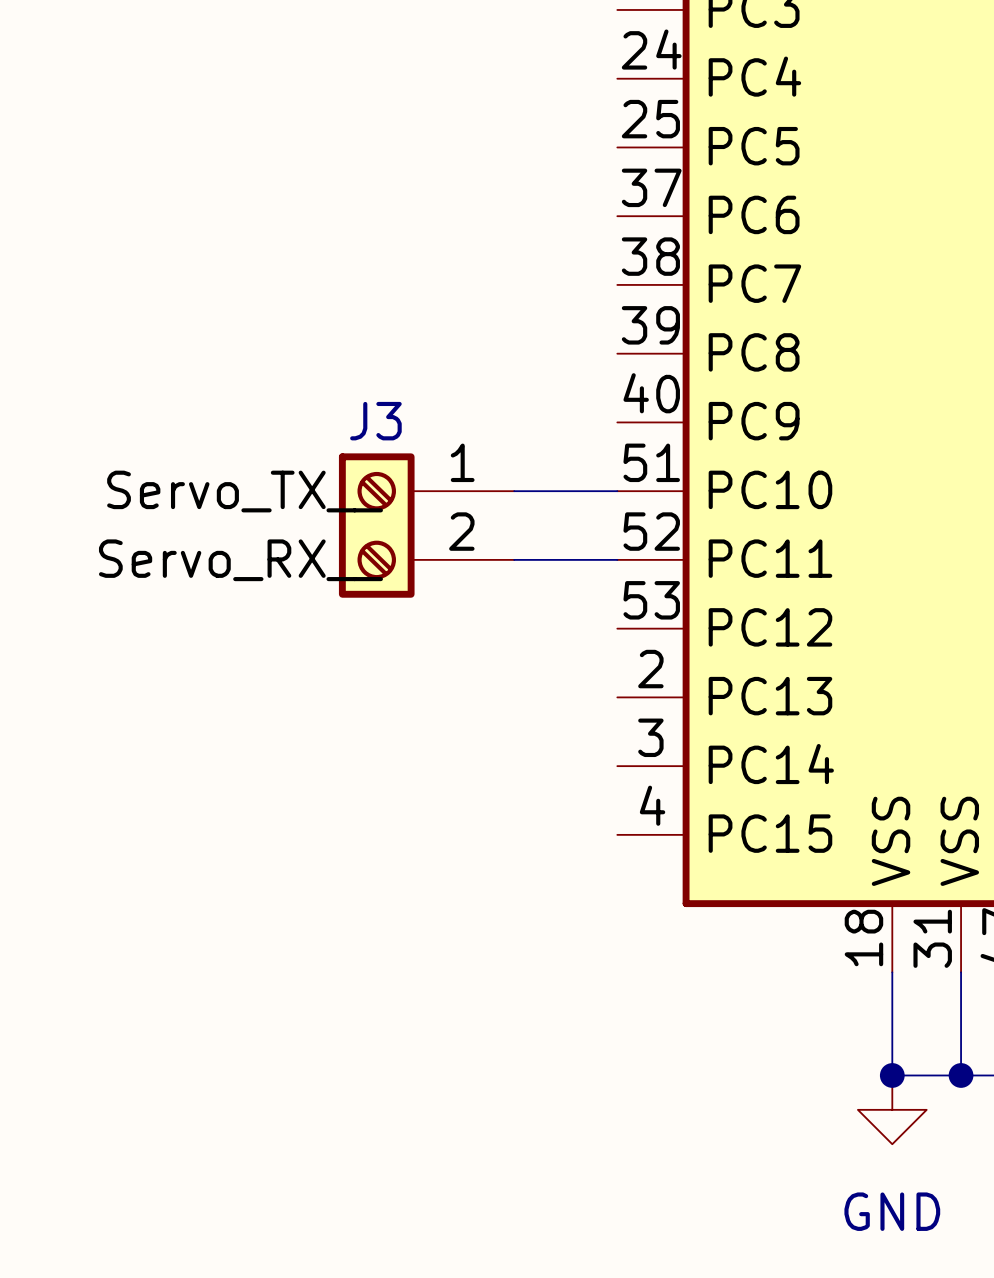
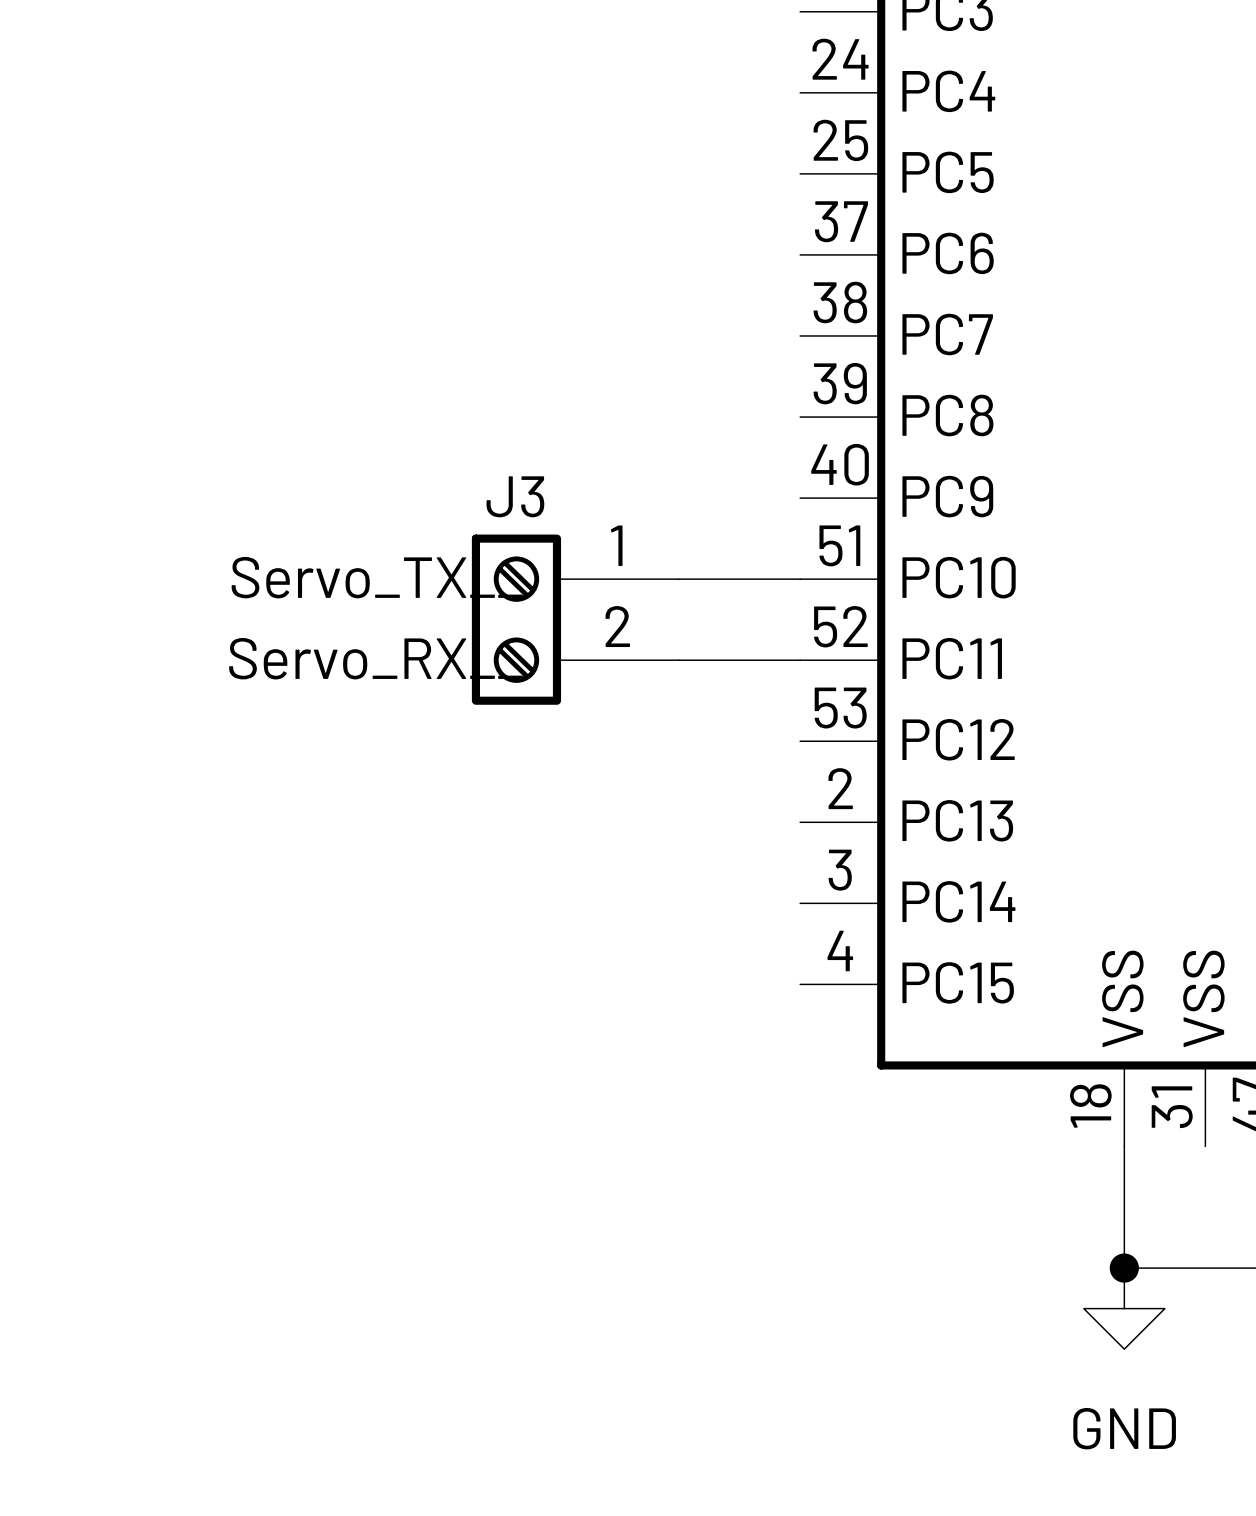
wire: (961, 972) (961, 1075) -> none
junction: (961, 1075) -> none

